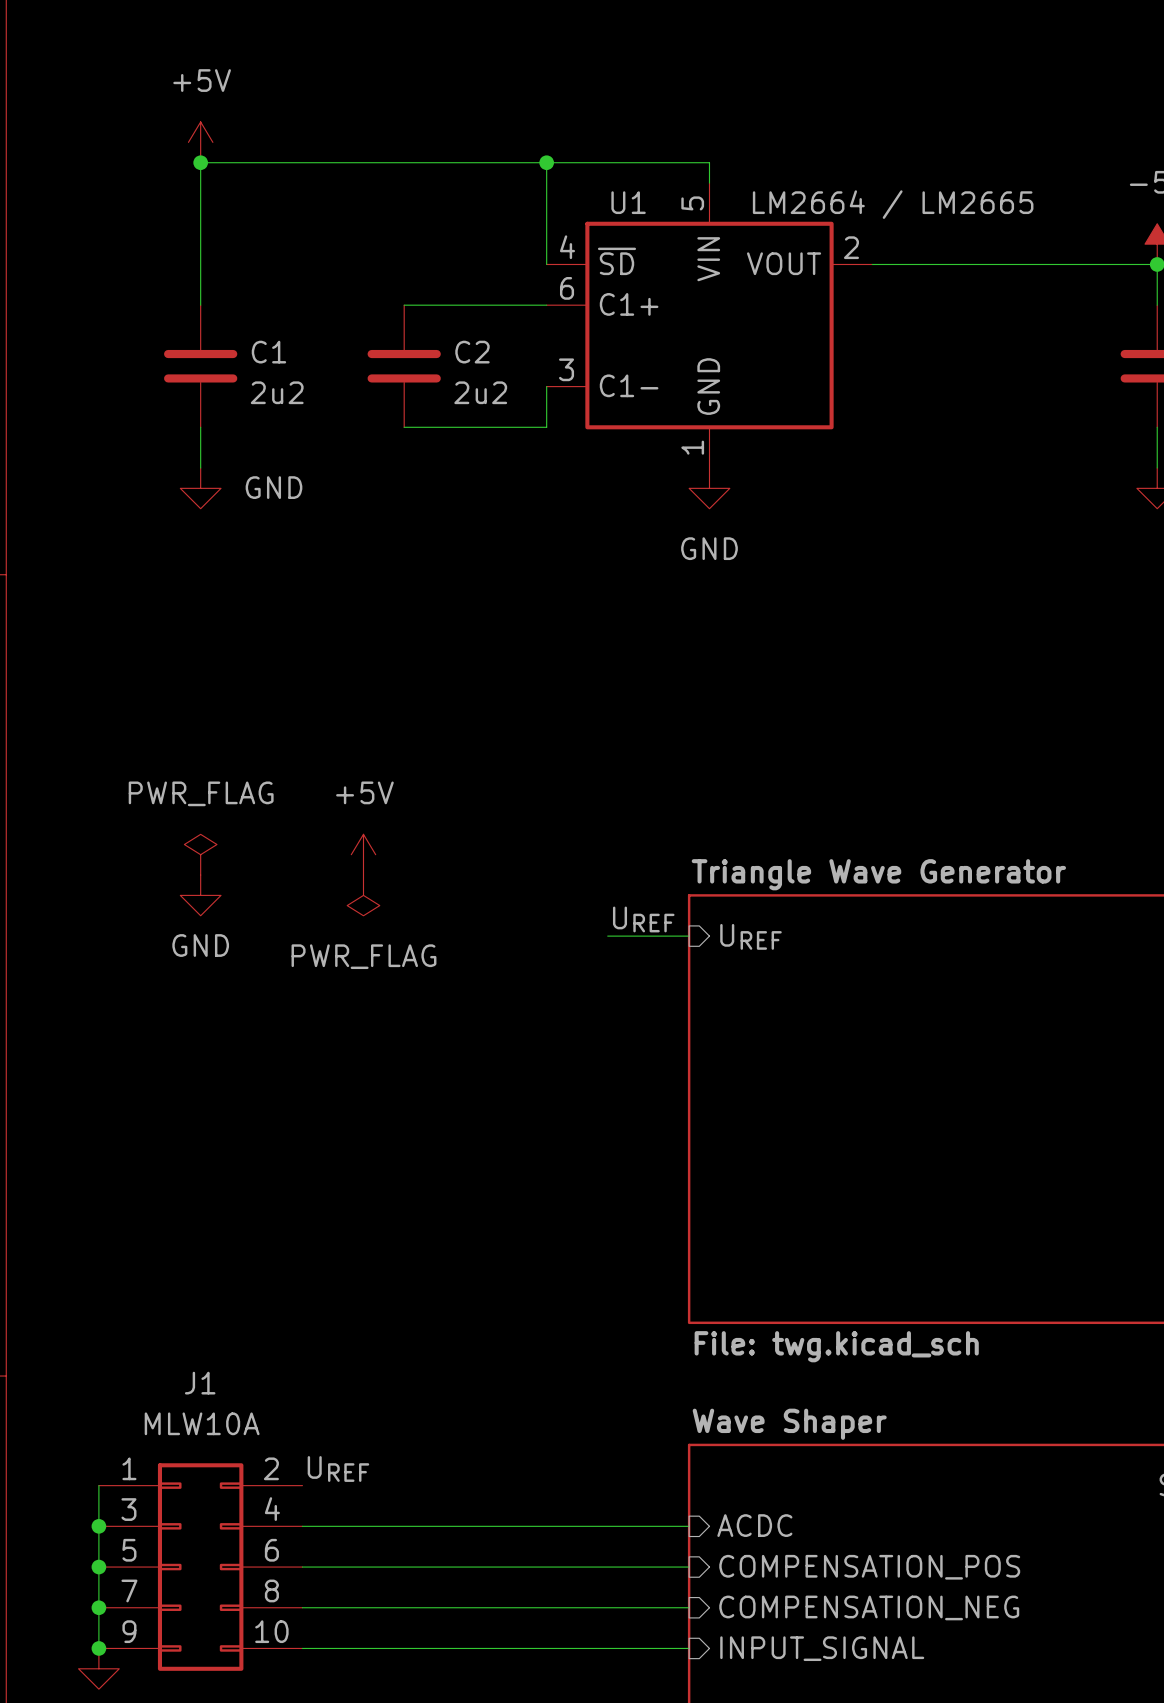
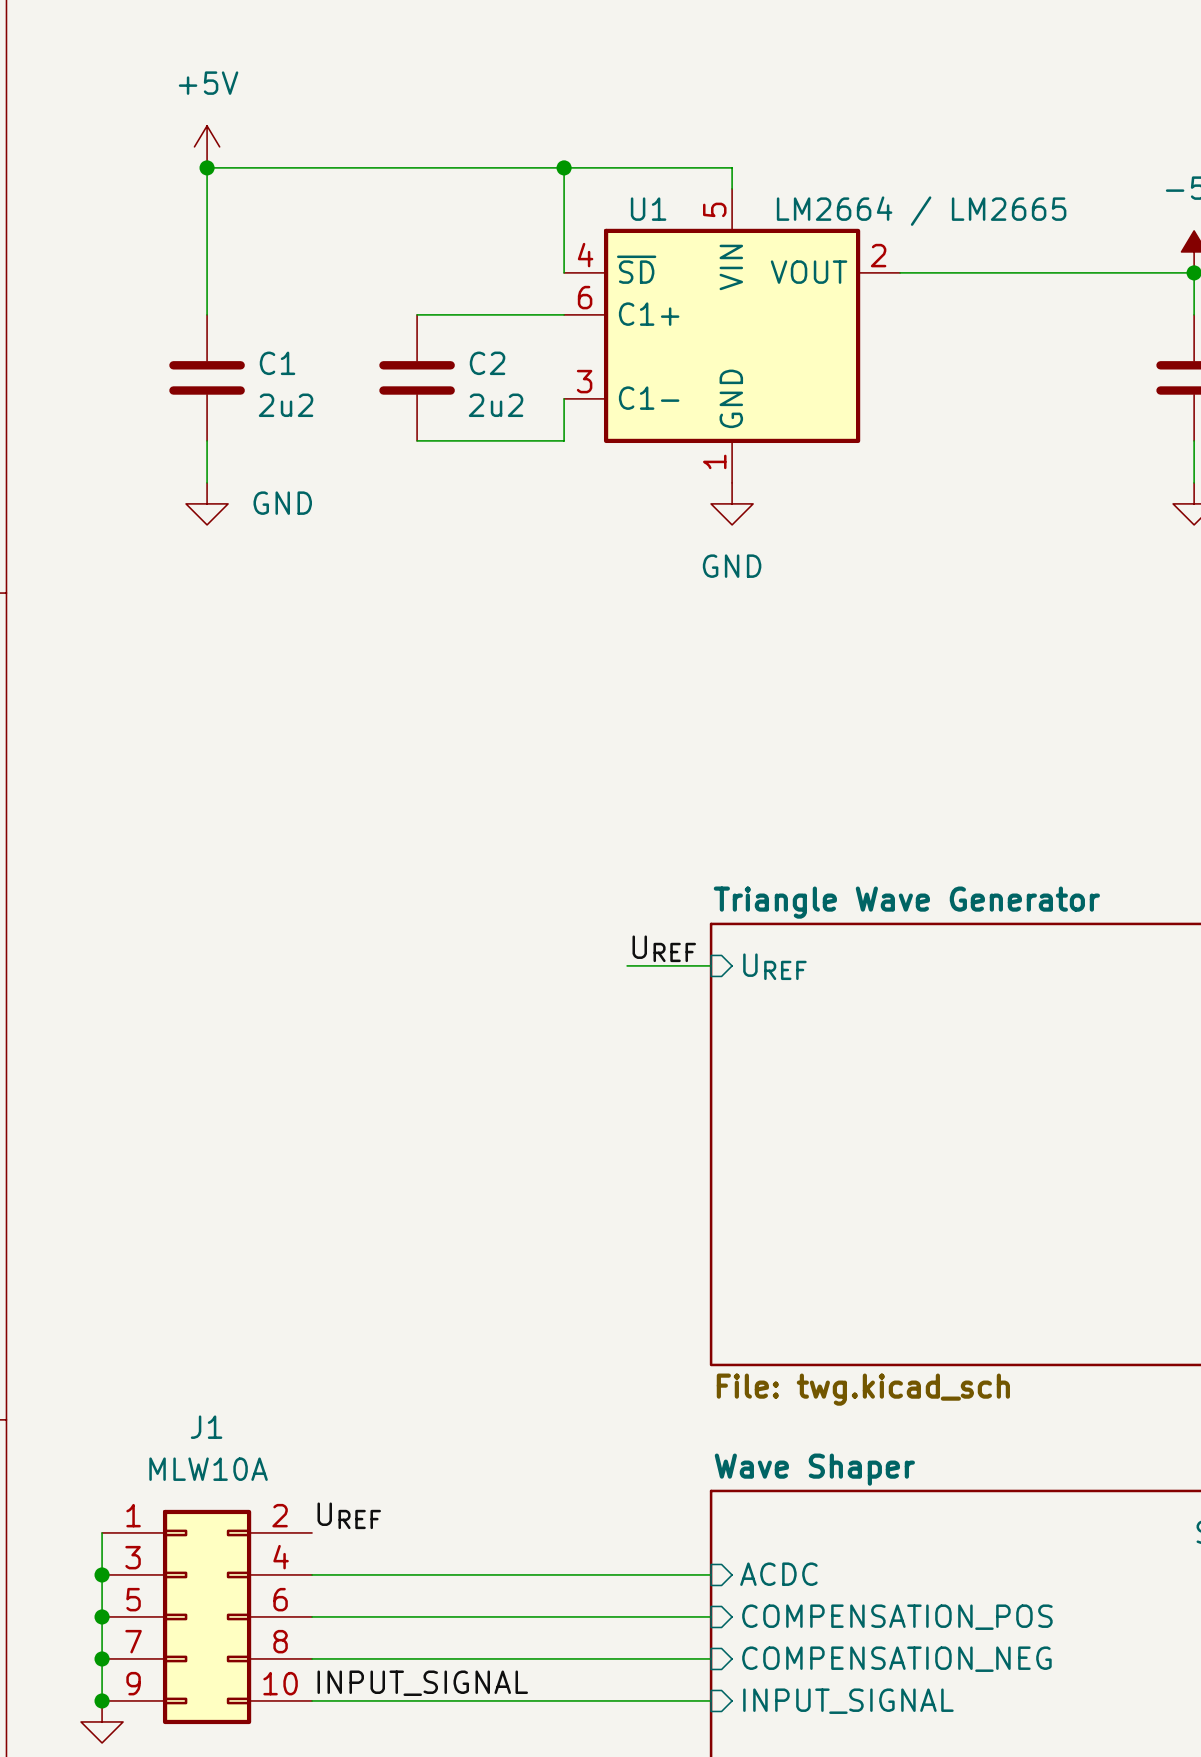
power symbol: PWR_FLAG (200, 854) -> none
power symbol: +5V (363, 854) -> none
power symbol: GND (200, 895) -> none
power symbol: PWR_FLAG (363, 895) -> none
label: none -> INPUT_SIGNAL (422, 1683)

